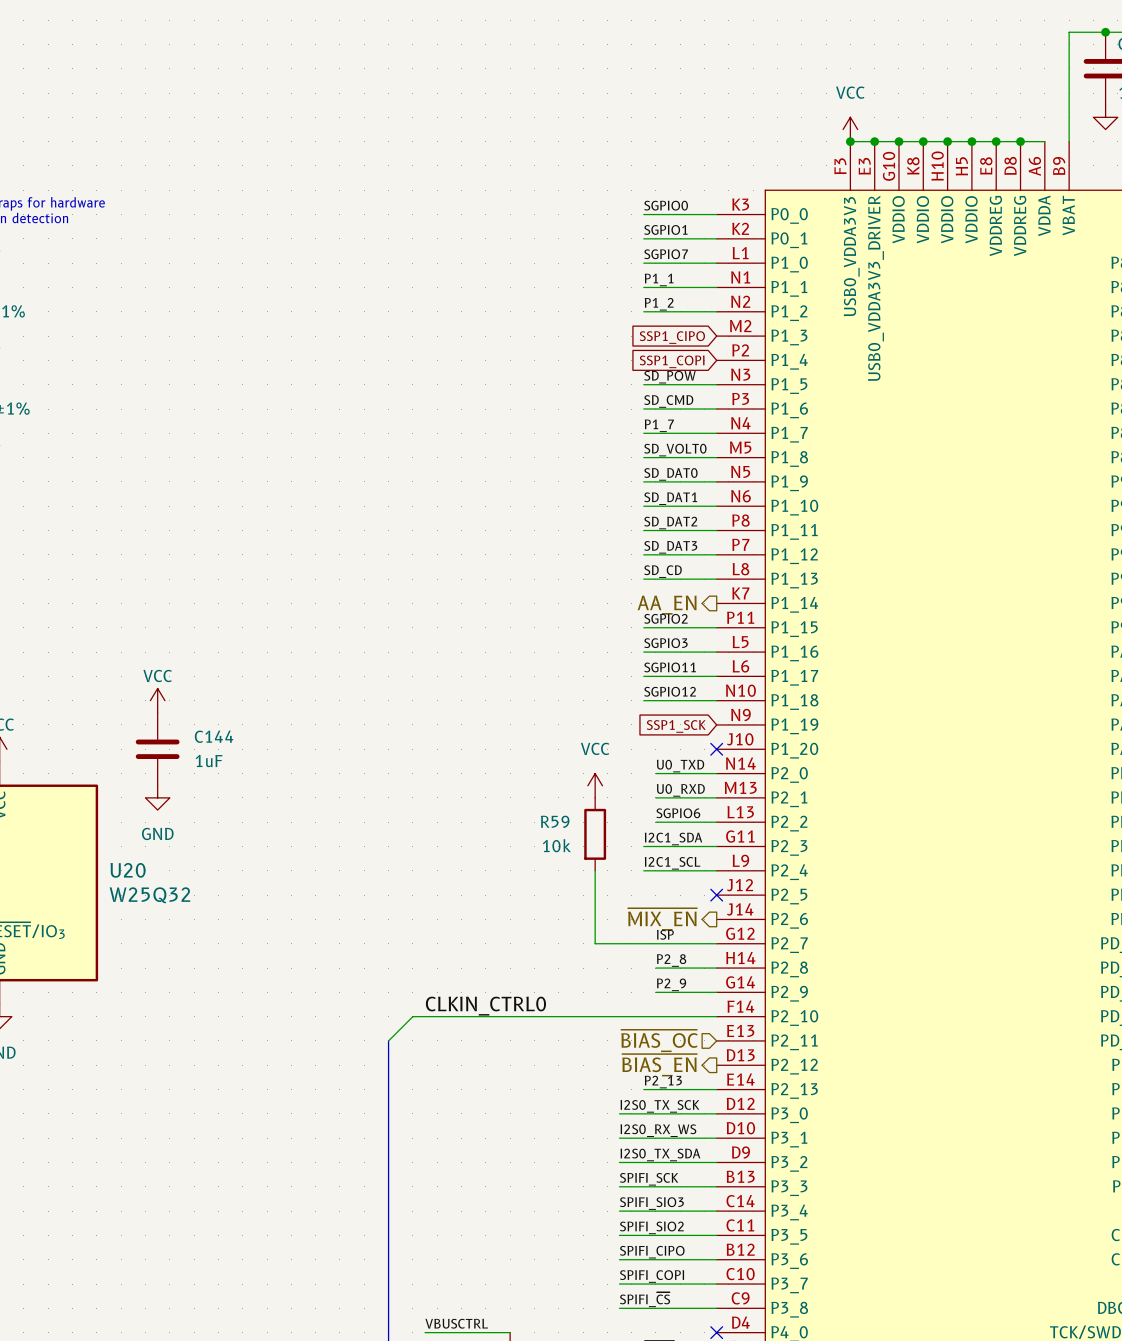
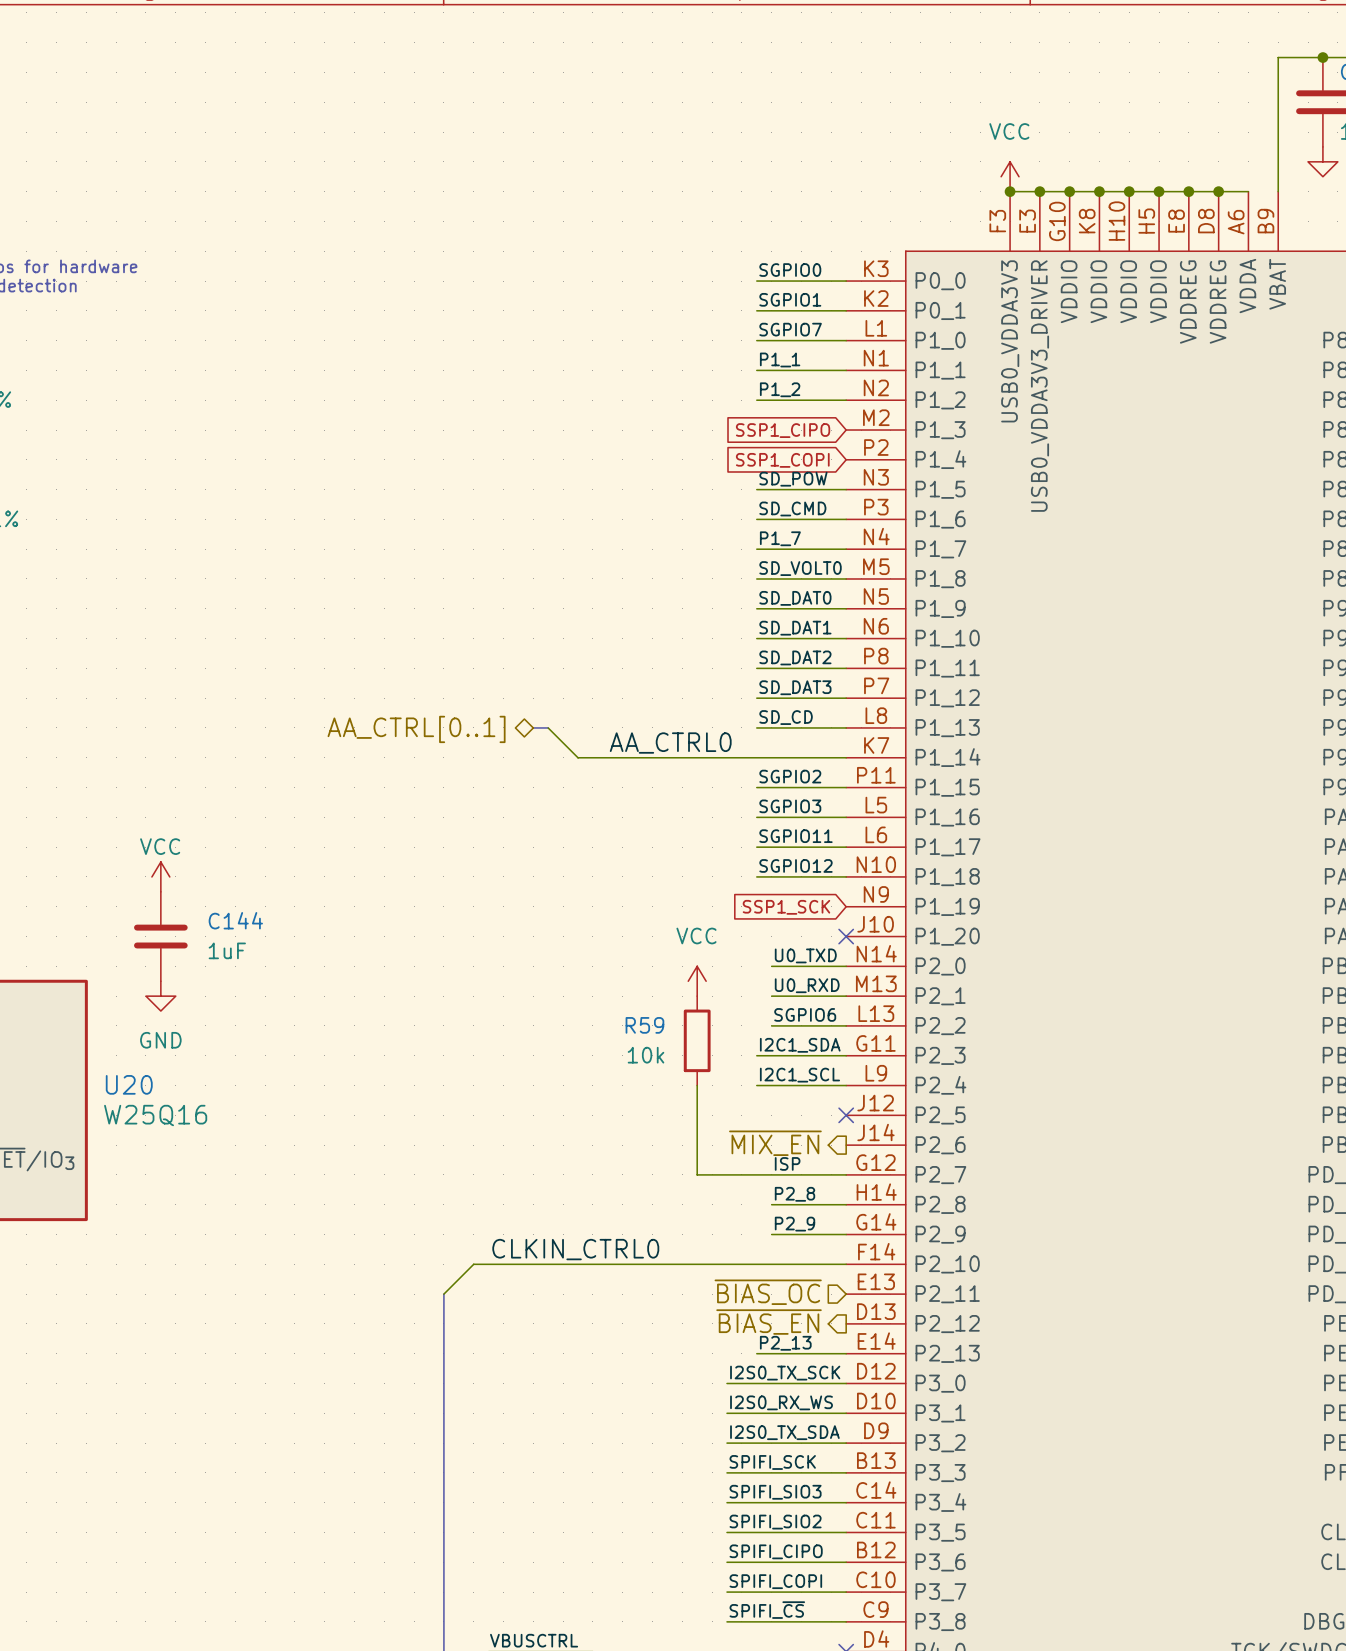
bus: none -> (533, 727) (548, 727)
wire: none -> (548, 727) (578, 757) (846, 757)
hierarchical label: none -> AA_CTRL[0..1] (416, 729)
label: none -> AA_CTRL0 (670, 743)
hierarchical label: AA_EN (667, 605) -> none
U20 value: W25Q32 (149, 895) -> W25Q16 (155, 1115)

